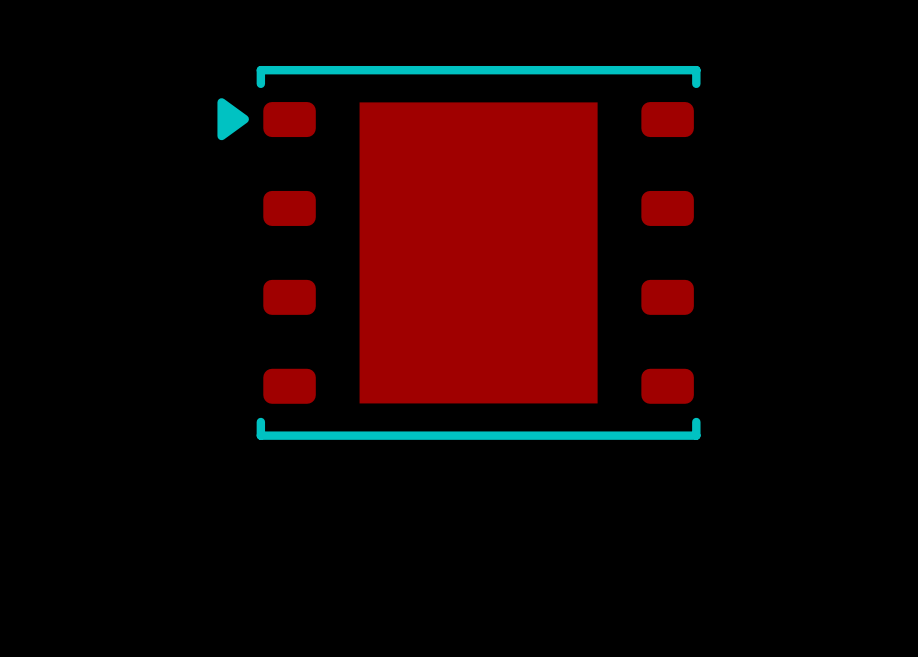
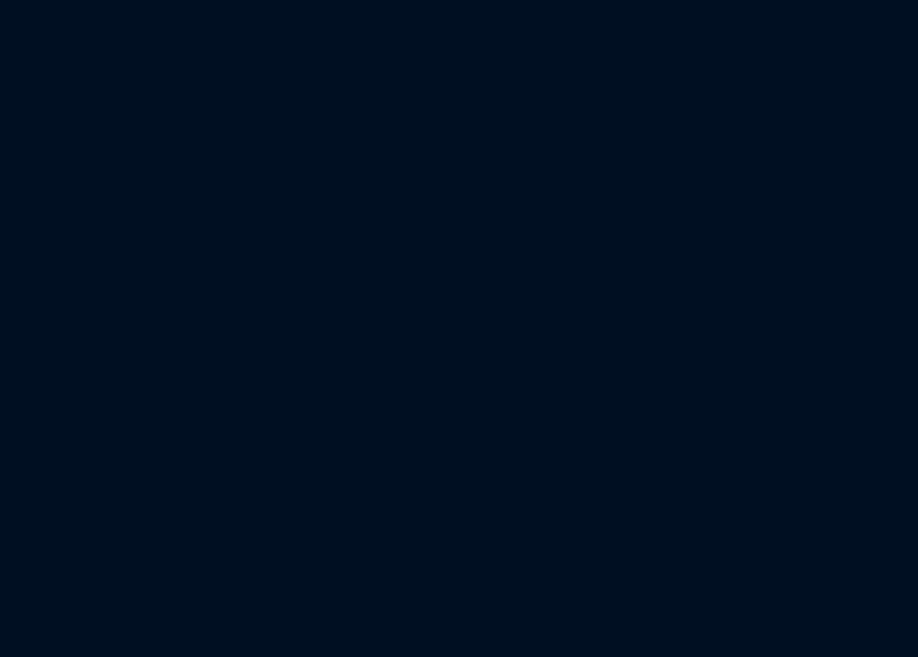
part: (458, 252) -> none

